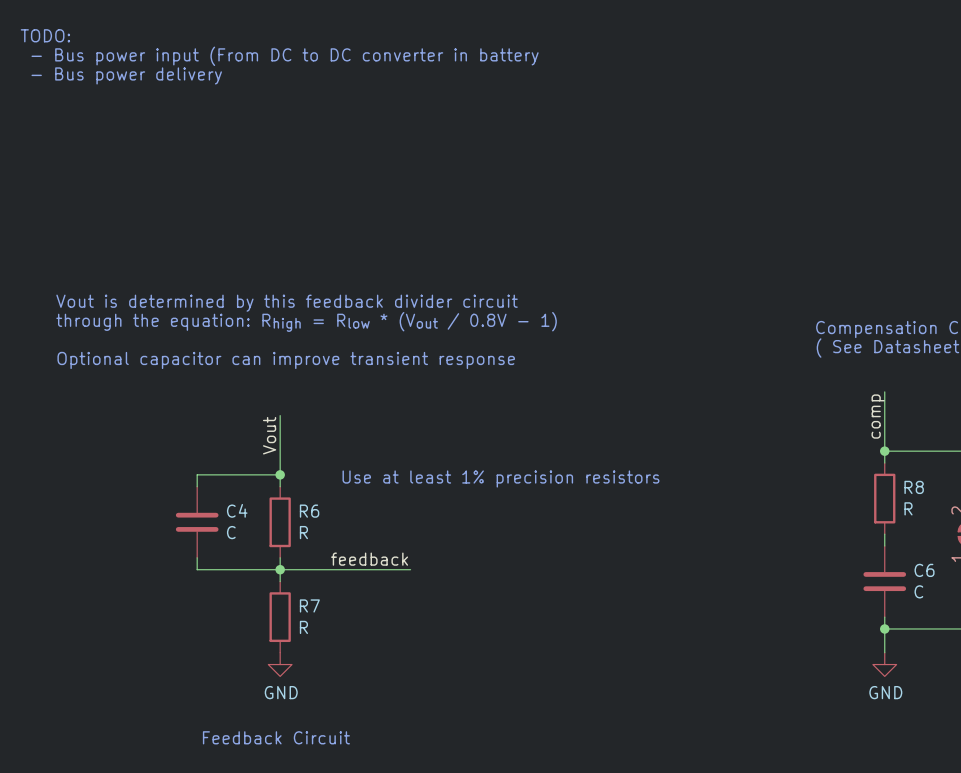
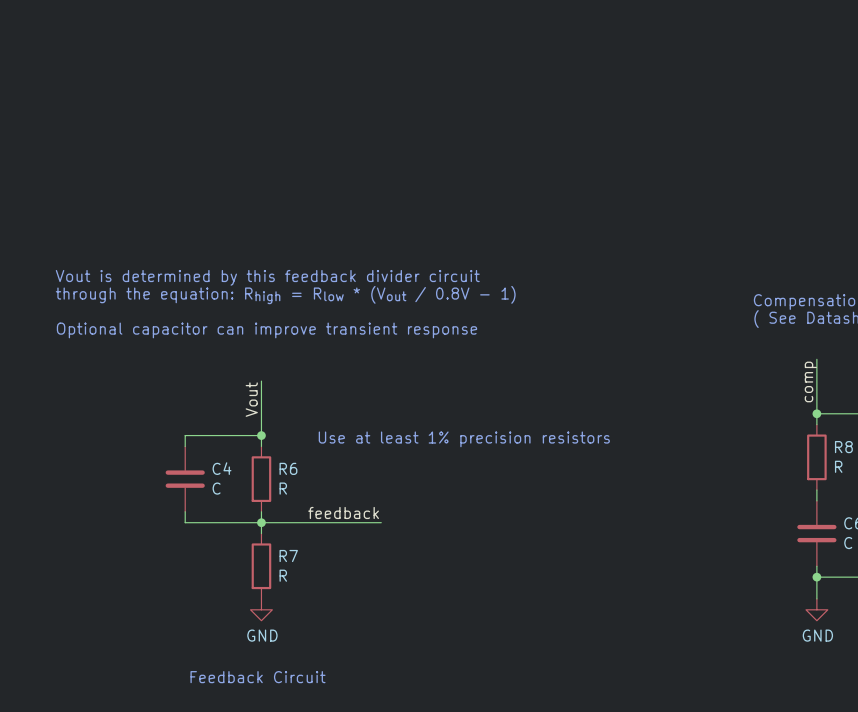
text: TODO: (45, 35) -> none
text: - Bus power input (From DC to DC converter in battery (285, 56) -> none
text: - Bus power delivery (126, 75) -> none

